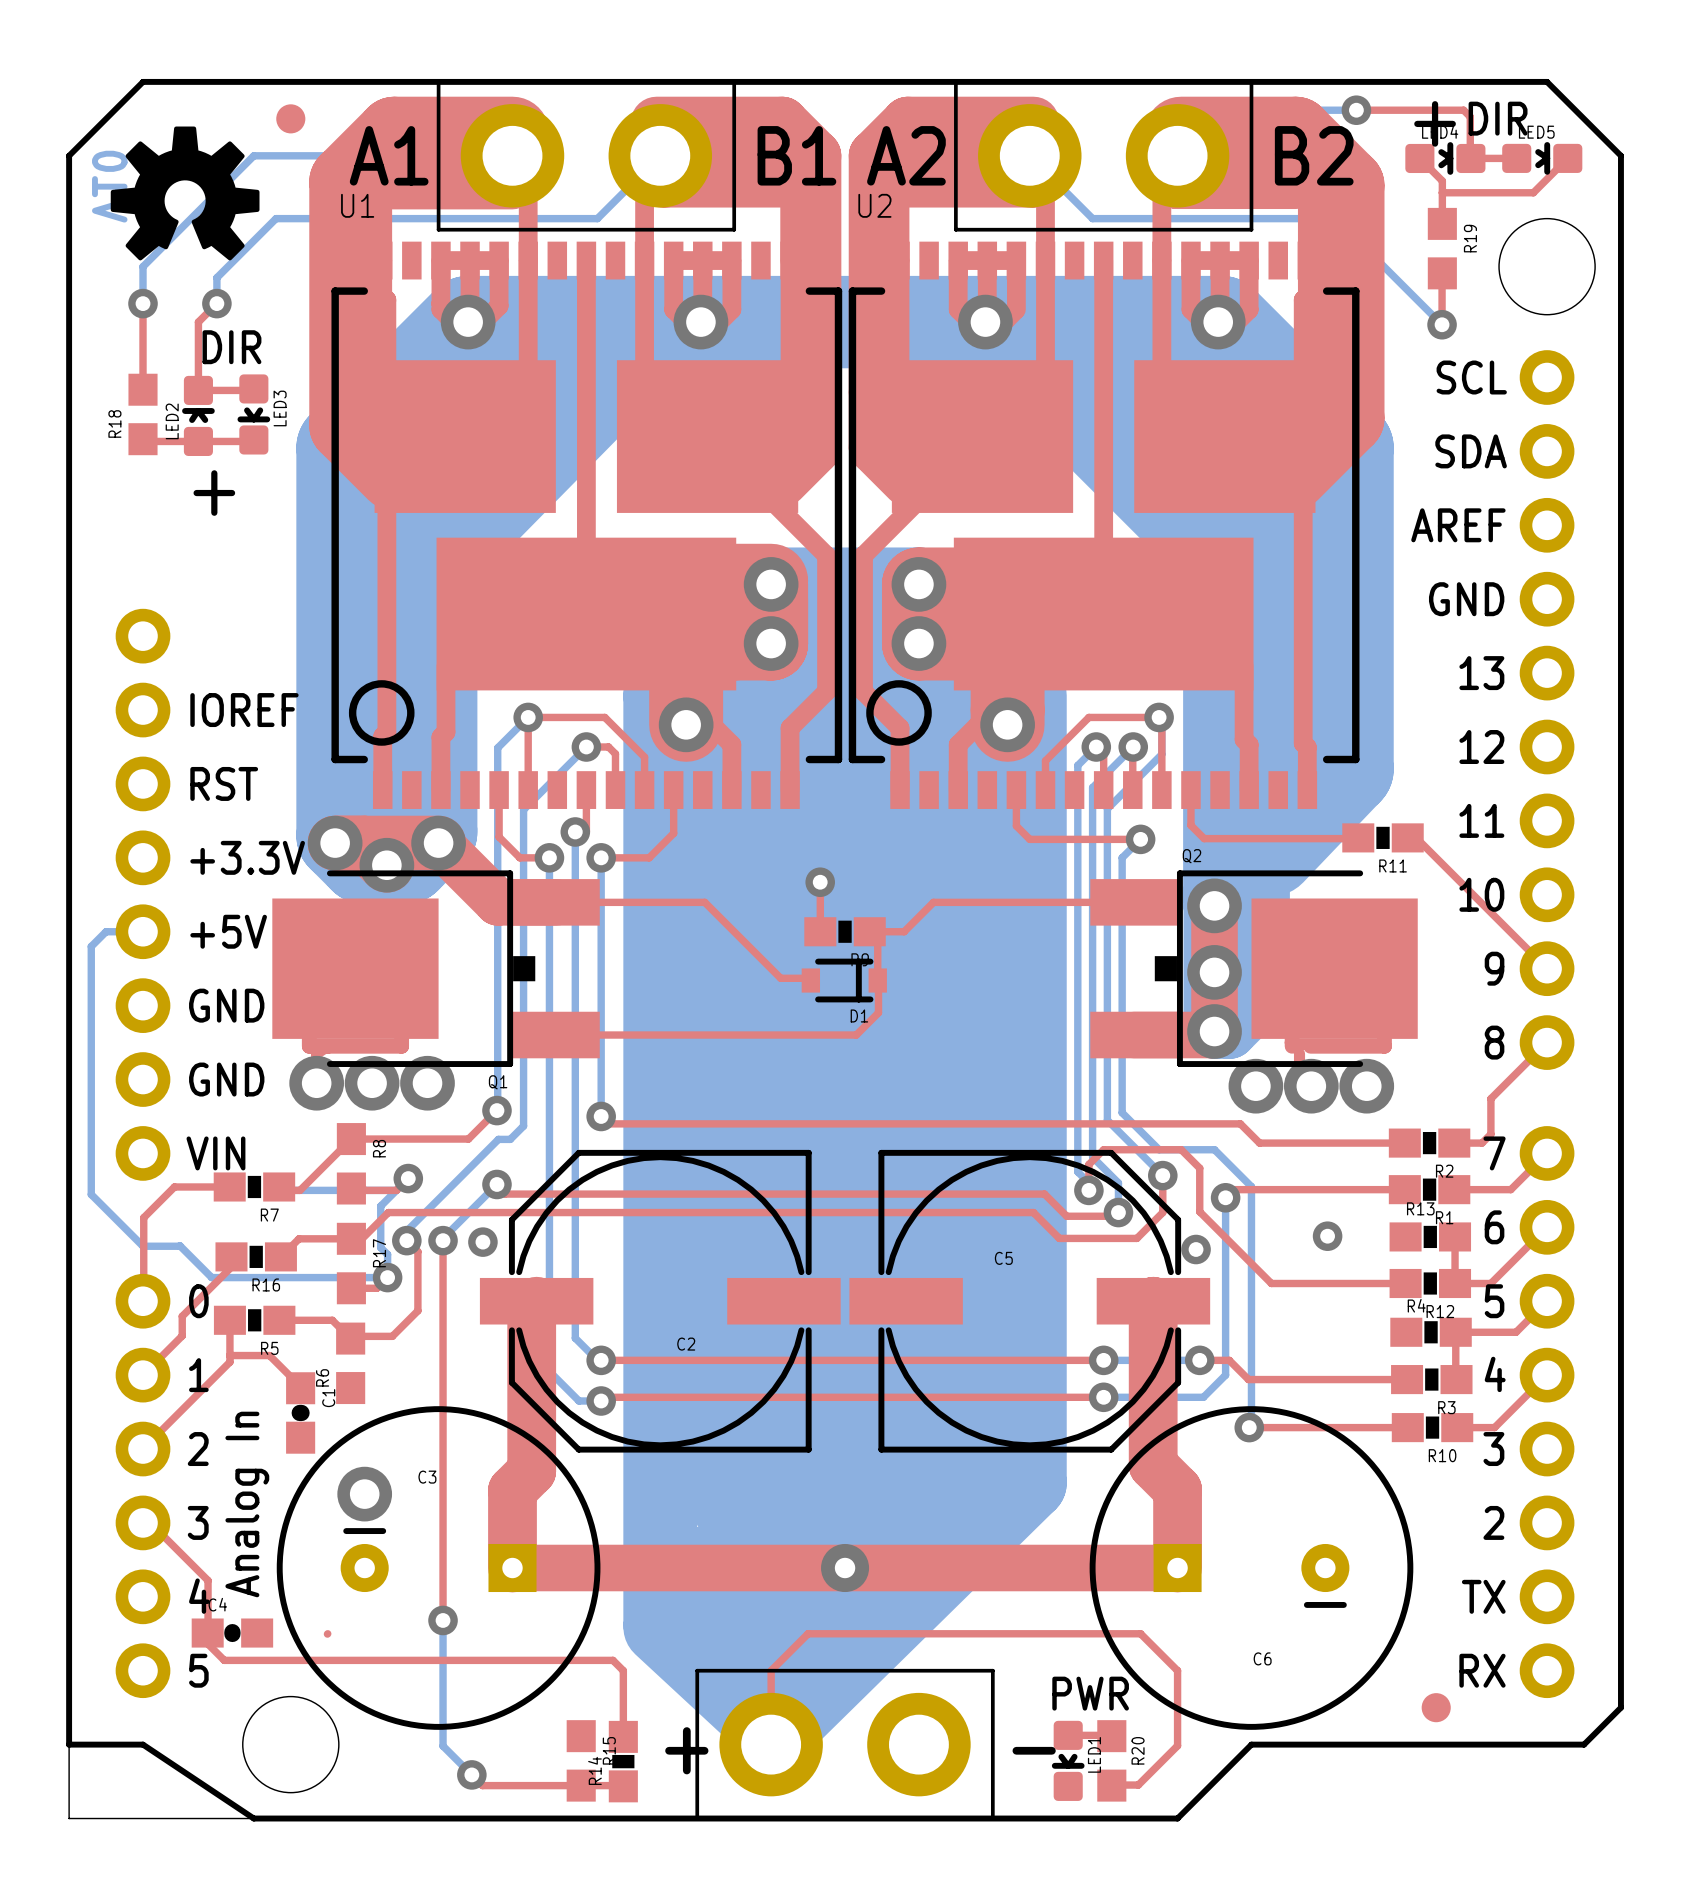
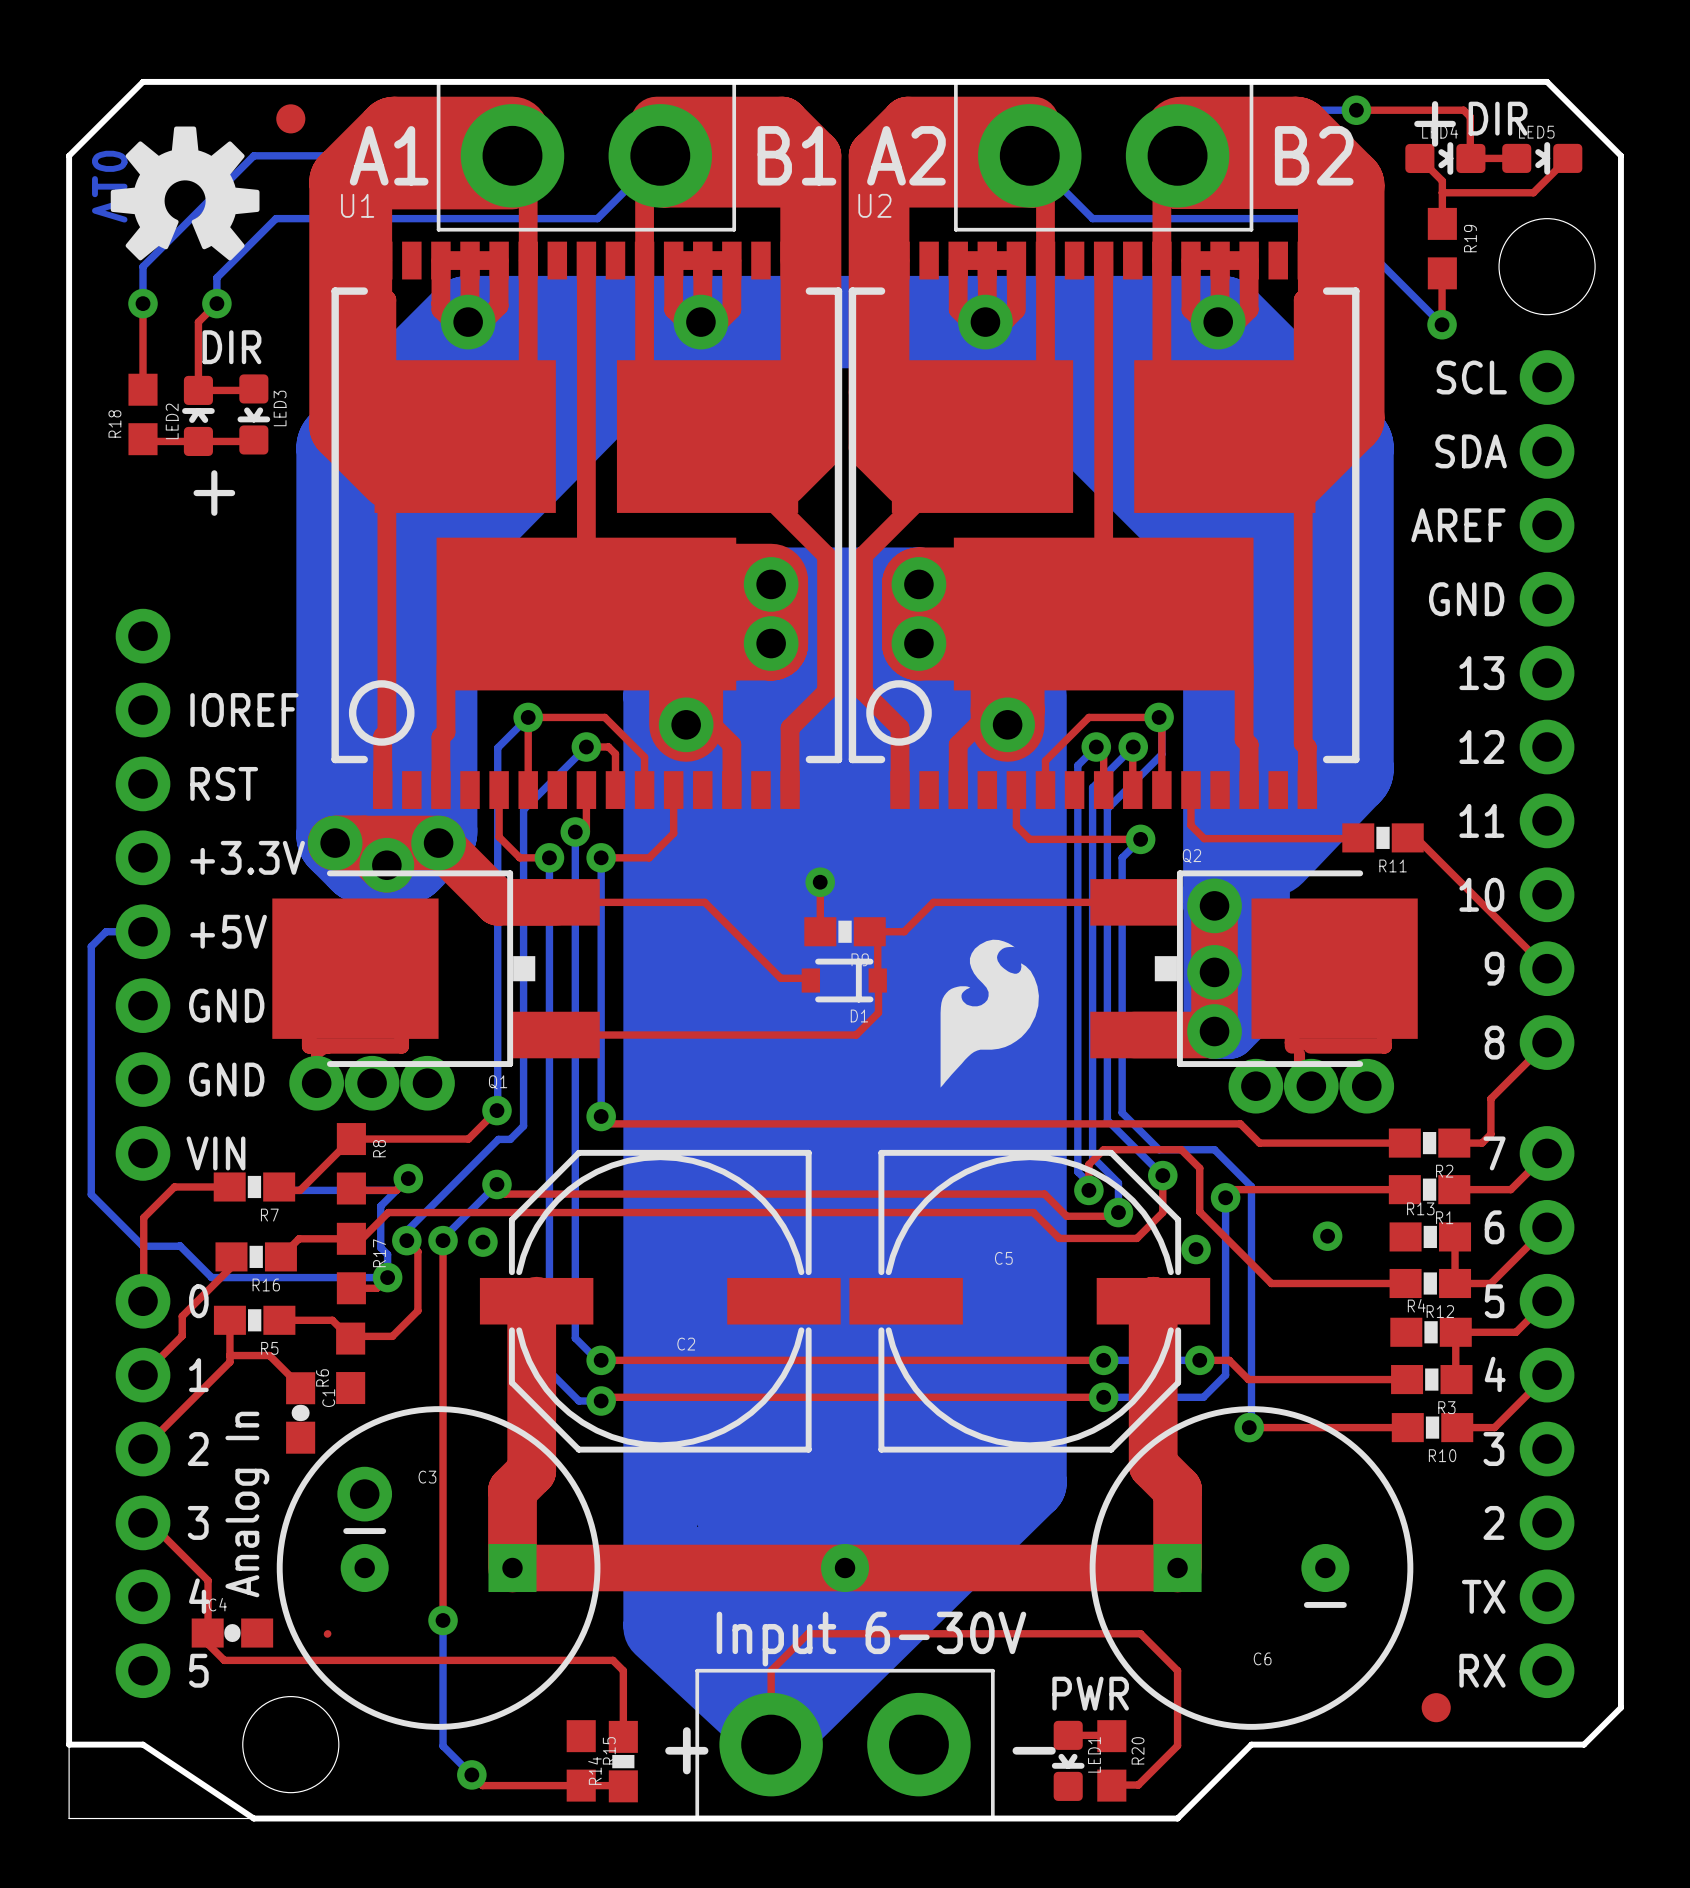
drawing: none -> [940, 939, 1039, 1088]
text: none -> Input 6-30V (871, 1639)

